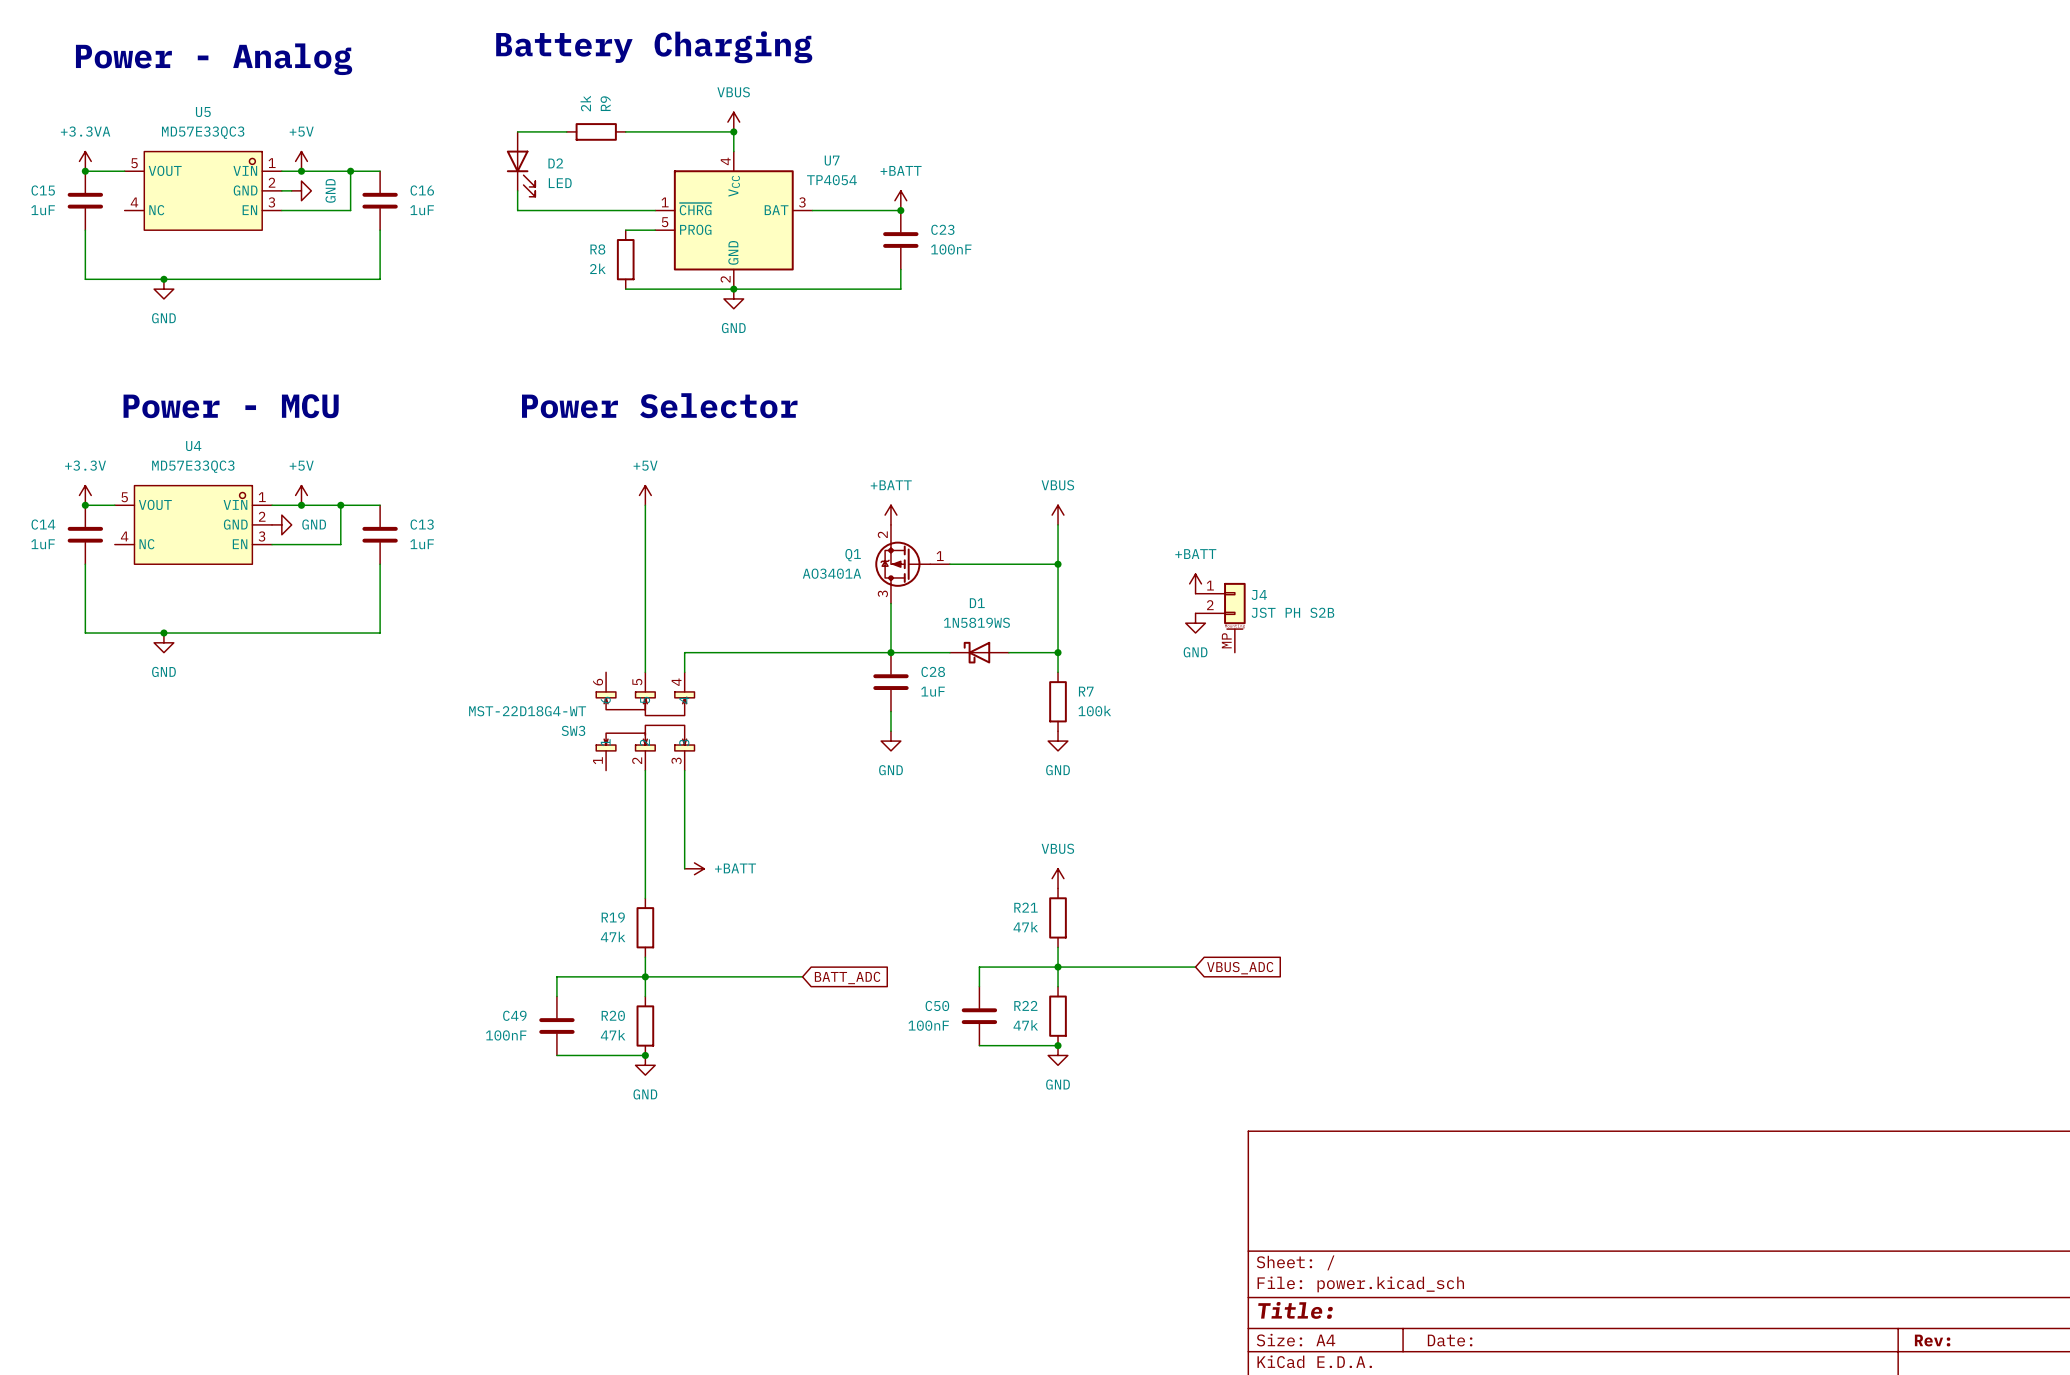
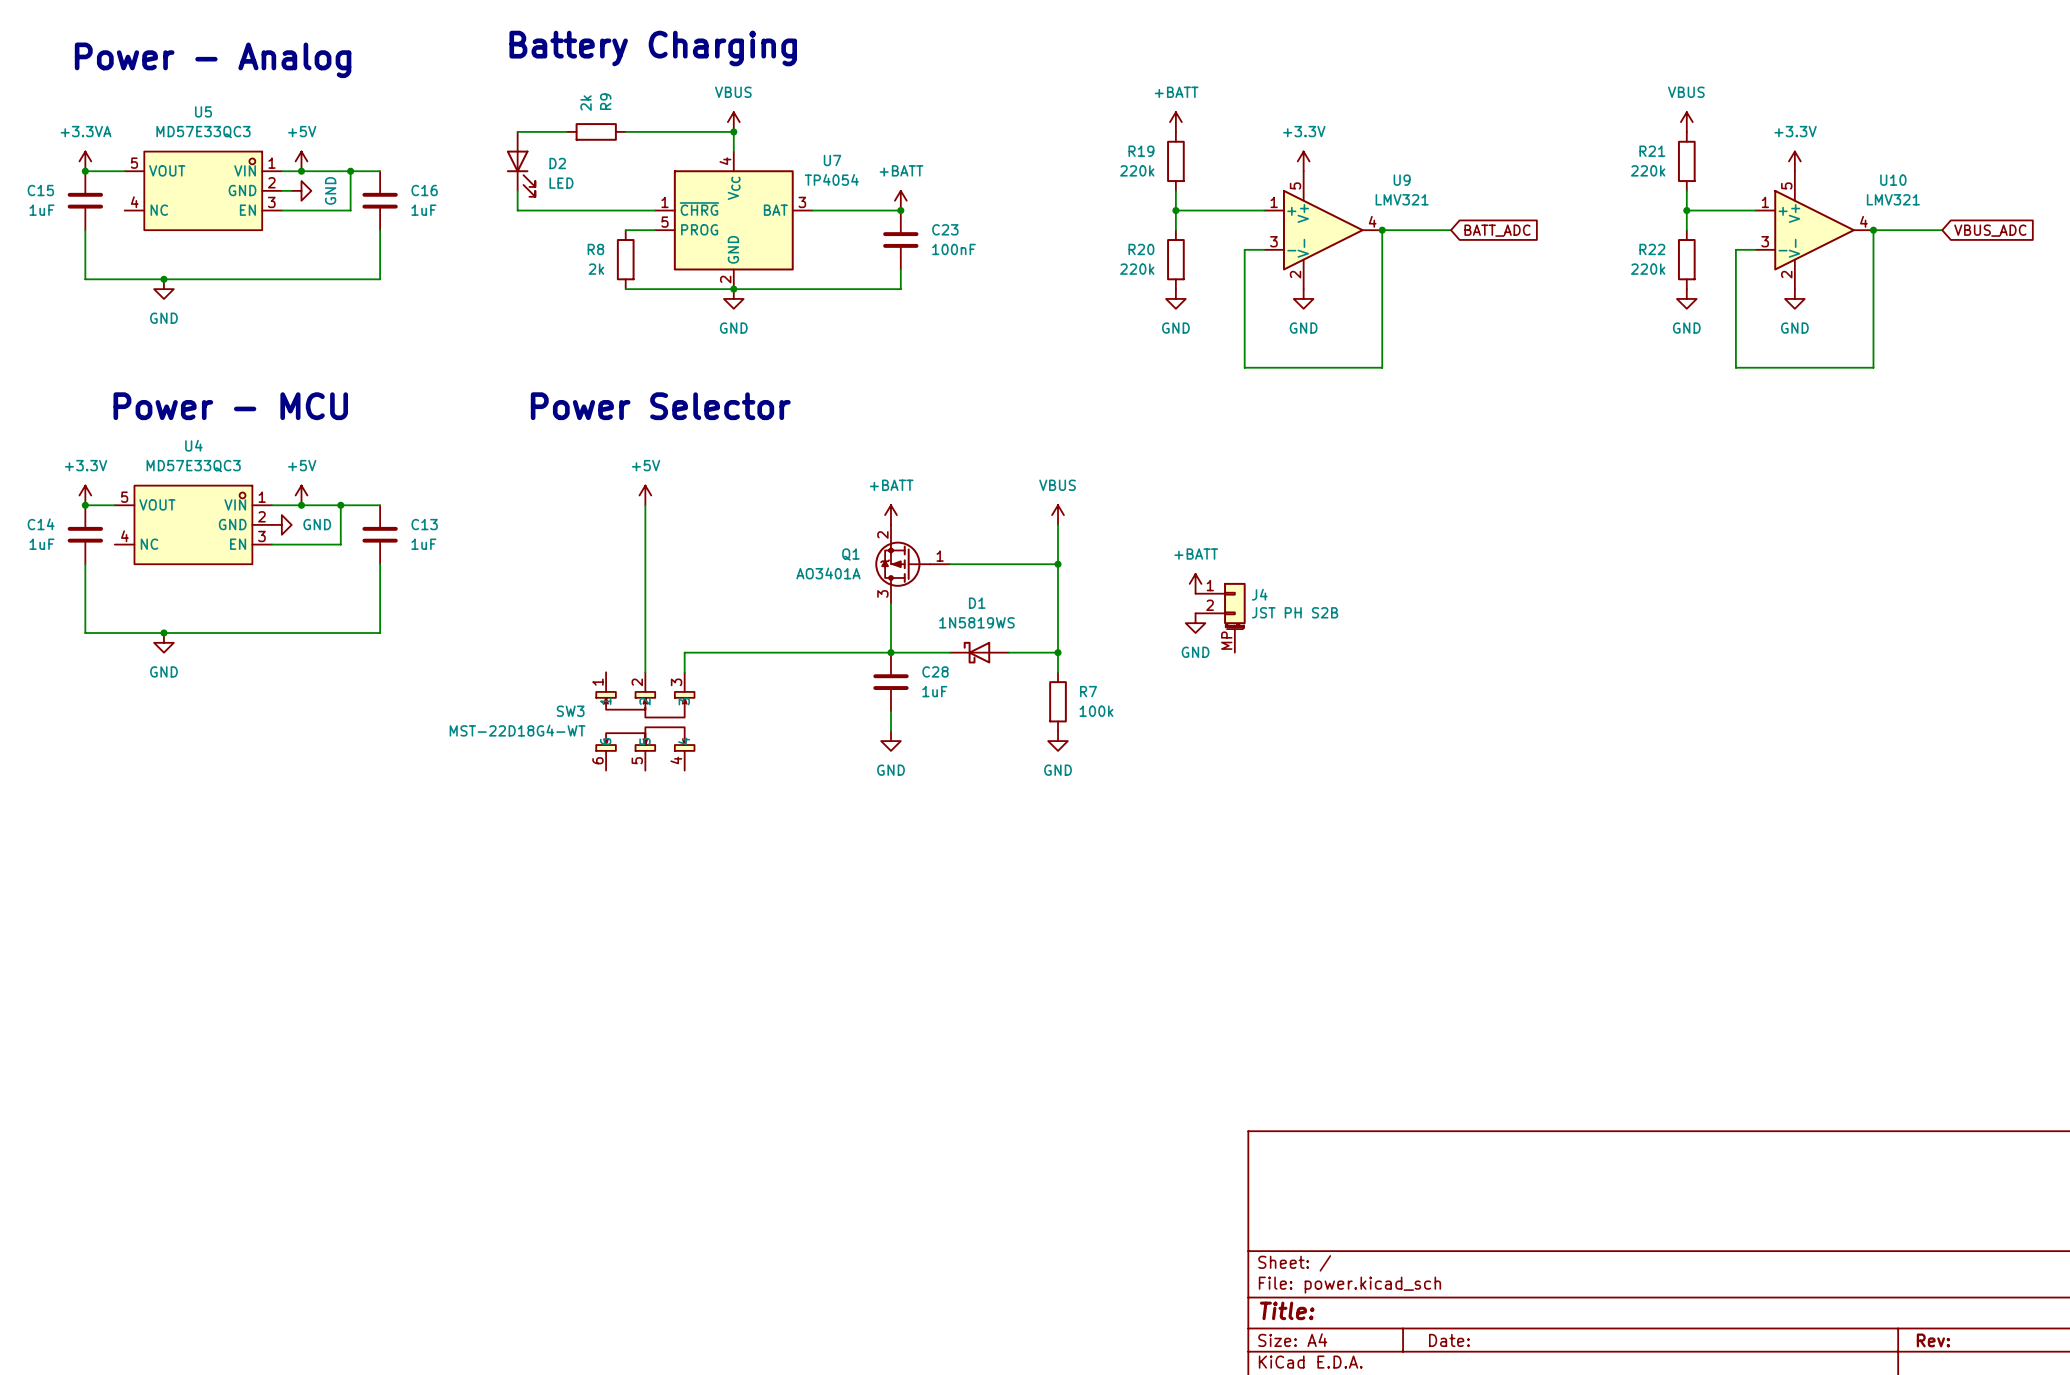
power symbol: none -> +BATT (1175, 122)
power symbol: none -> VBUS (1686, 122)
power symbol: none -> +3.3V (1303, 161)
power symbol: none -> +3.3V (1794, 161)
wire: none -> (1175, 190) (1175, 230)
wire: none -> (1686, 190) (1686, 230)
wire: none -> (1175, 210) (1264, 210)
junction: none -> (1175, 210)
wire: none -> (1686, 210) (1755, 210)
junction: none -> (1686, 210)
U9: none -> LMV321 (1323, 230)
junction: none -> (1382, 230)
wire: none -> (1451, 230) (1382, 230) (1382, 367) (1244, 367) (1244, 249) (1264, 249)
U10: none -> LMV321 (1814, 230)
junction: none -> (1873, 230)
wire: none -> (1942, 230) (1873, 230) (1873, 367) (1735, 367) (1735, 249) (1755, 249)
global label: none -> BATT_ADC (1497, 230)
global label: none -> VBUS_ADC (1990, 230)
power symbol: none -> GND (1175, 298)
power symbol: none -> GND (1303, 298)
power symbol: none -> GND (1686, 298)
power symbol: none -> GND (1794, 298)
SW3 flip: as is (645, 721) -> up-down (645, 721)
wire: (645, 770) (645, 898) -> none
wire: (684, 770) (684, 868) -> none
power symbol: +BATT (694, 868) -> none
power symbol: VBUS (1058, 878) -> none
R21 position: (1058, 917) -> (1686, 161)
R19 position: (645, 927) -> (1175, 161)
R21 value: 47k (1025, 927) -> 220k (1648, 170)
R19 value: 47k (613, 936) -> 220k (1137, 170)
wire: (1058, 947) (1058, 986) -> none
wire: (645, 957) (645, 996) -> none
junction: (1058, 967) -> none
wire: (1195, 967) (979, 967) (979, 986) -> none
global label: VBUS_ADC (1240, 968) -> none
junction: (645, 976) -> none
wire: (802, 976) (556, 976) (556, 996) -> none
global label: BATT_ADC (847, 977) -> none
C50: 100nF (979, 1016) -> none
R22 position: (1058, 1016) -> (1686, 259)
R22 value: 47k (1025, 1025) -> 220k (1648, 269)
C49: 100nF (556, 1026) -> none
R20 position: (645, 1026) -> (1175, 259)
R20 value: 47k (613, 1035) -> 220k (1137, 269)
wire: (979, 1045) (1058, 1045) -> none
junction: (1058, 1045) -> none
wire: (556, 1055) (645, 1055) -> none
junction: (645, 1055) -> none
power symbol: GND (1058, 1055) -> none
power symbol: GND (645, 1065) -> none

